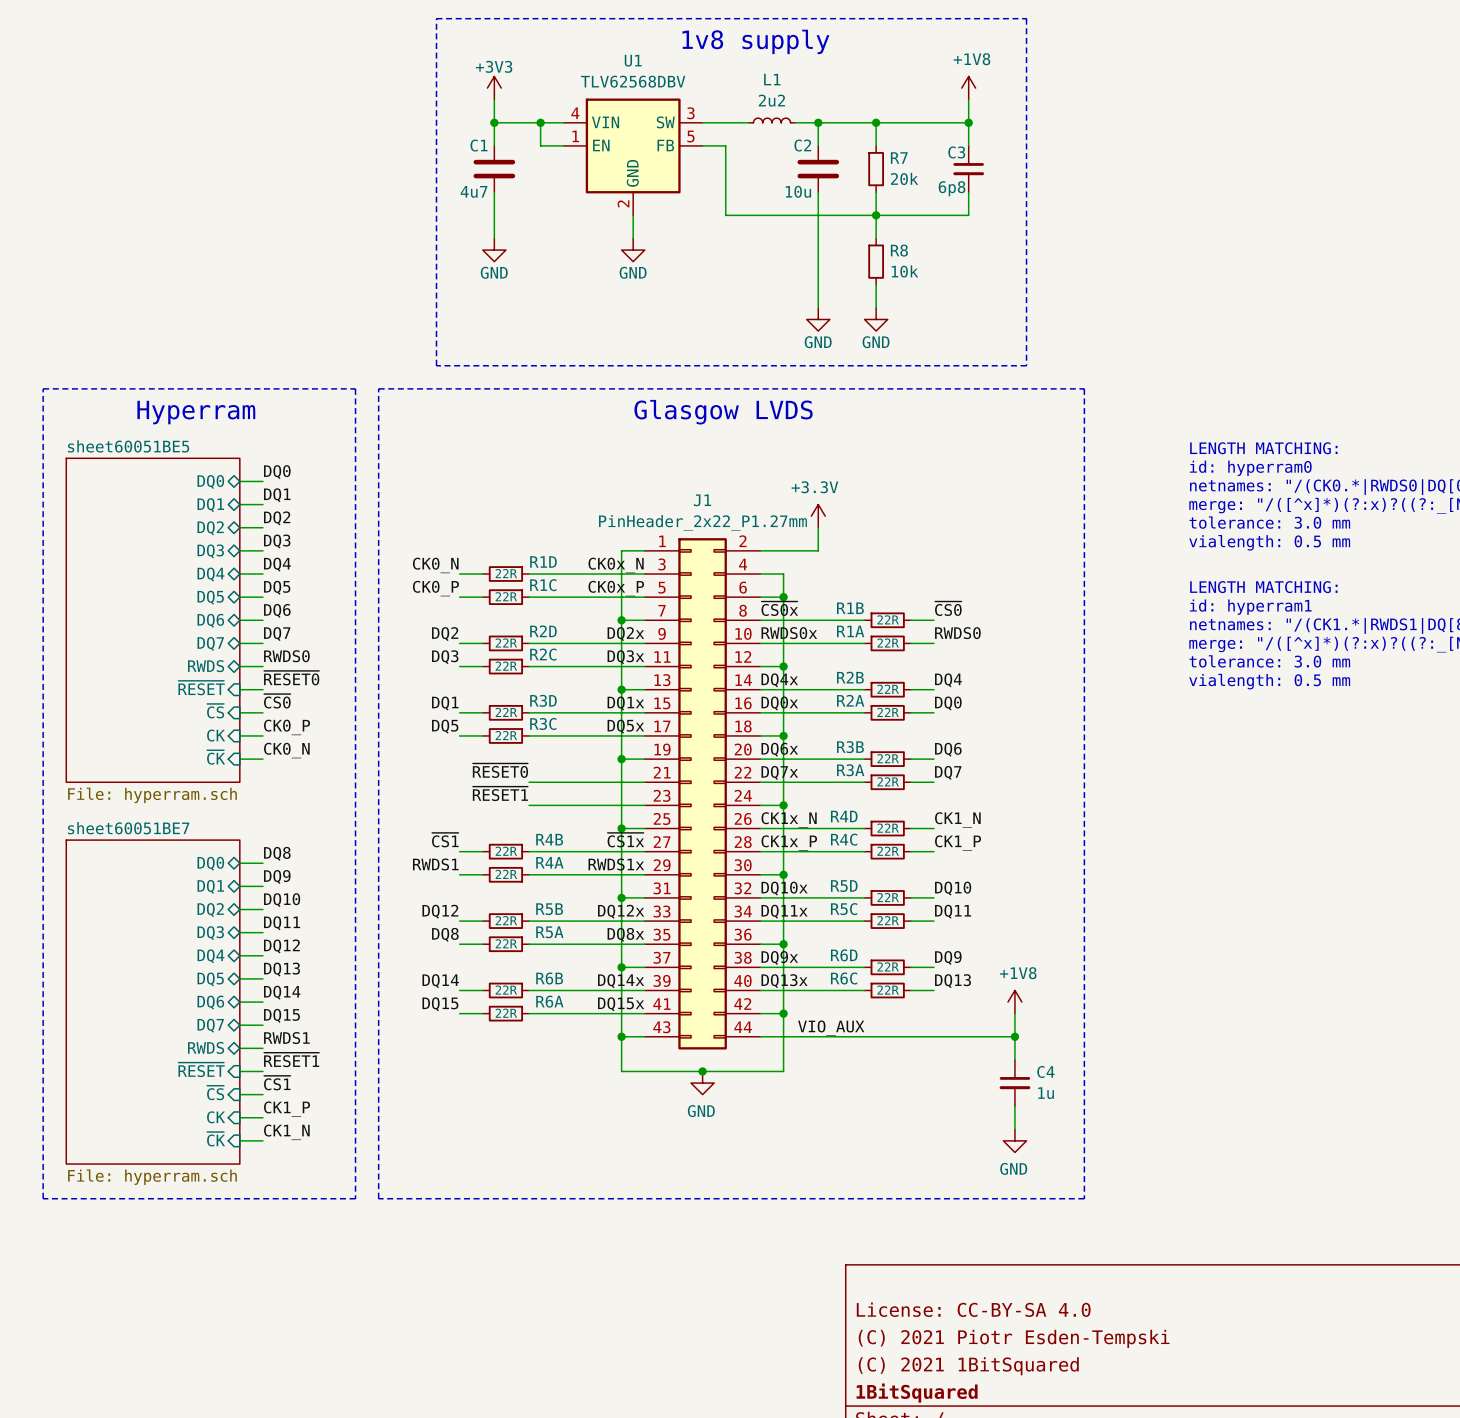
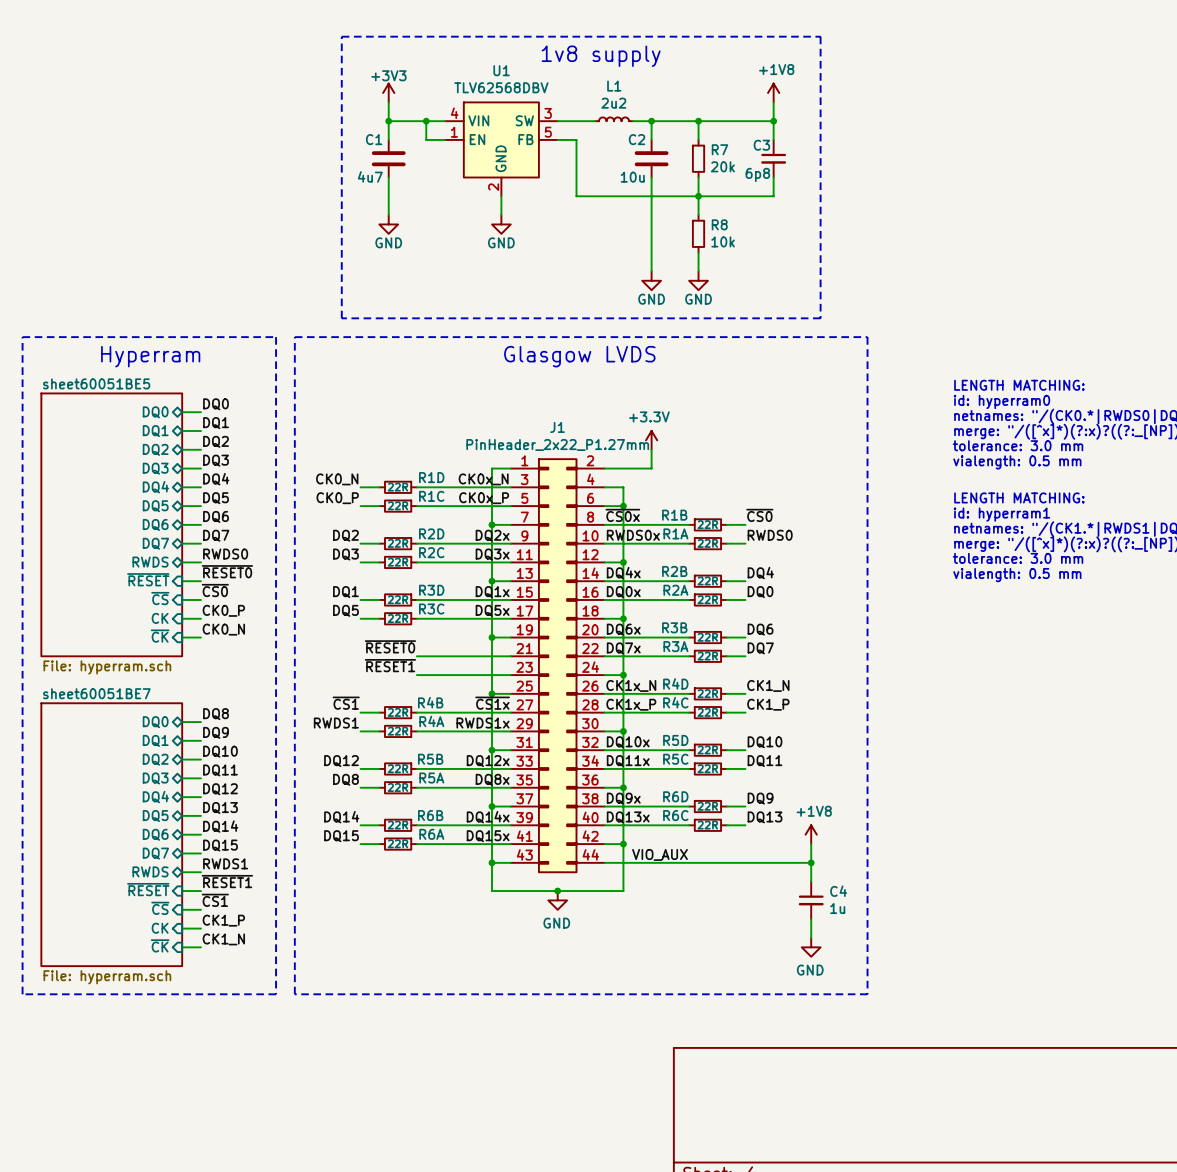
title block: License: CC-BY-SA 4.0 (973, 1309) -> none
title block: (C) 2021 Piotr Esden-Tempski (1014, 1338) -> none
title block: (C) 2021 1BitSquared (968, 1366) -> none
title block: 1BitSquared (917, 1393) -> none

